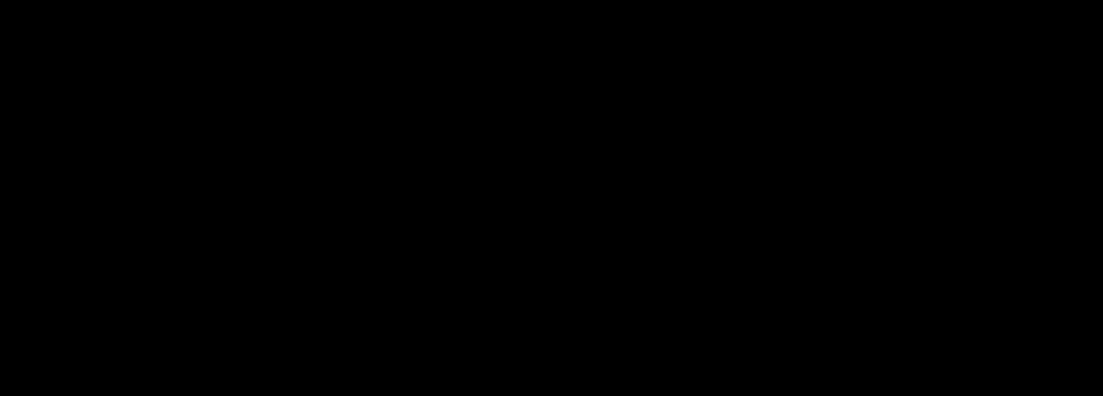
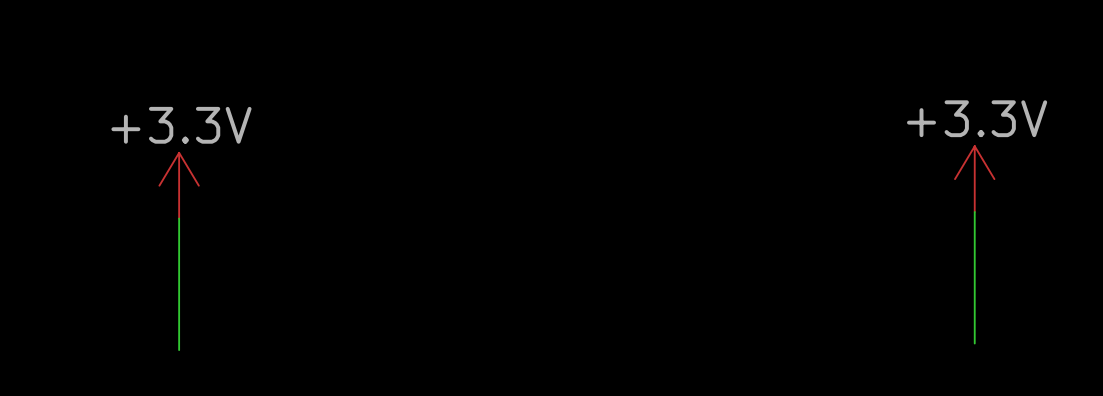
power symbol: none -> +3.3V (974, 179)
power symbol: none -> +3.3V (179, 185)
wire: none -> (974, 212) (974, 343)
wire: none -> (179, 218) (179, 350)

